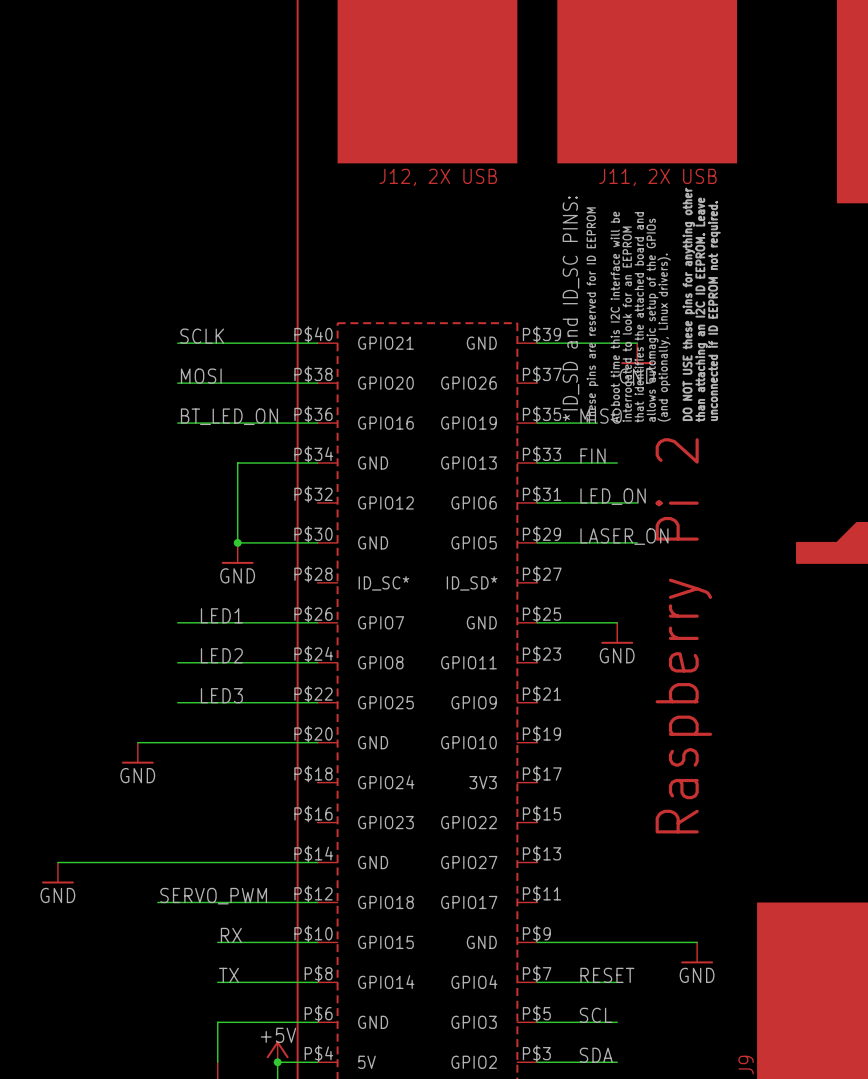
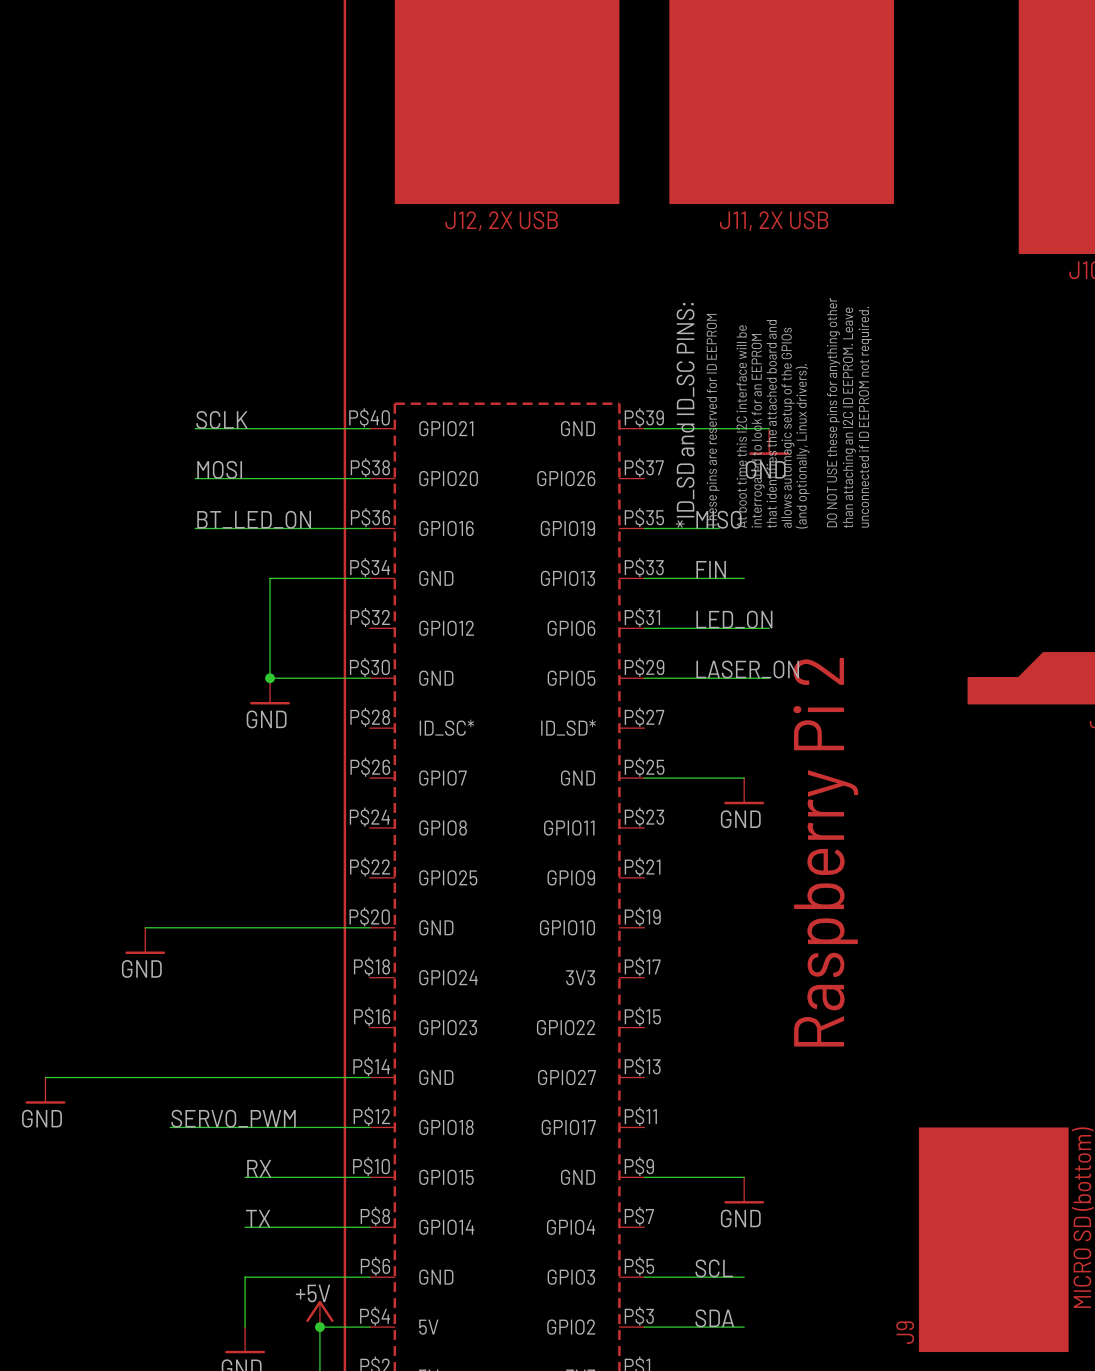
label: LED1 (221, 615) -> none
wire: (177, 622) (317, 622) -> none
label: LED2 (221, 655) -> none
wire: (177, 662) (317, 662) -> none
label: LED3 (221, 695) -> none
wire: (177, 702) (317, 702) -> none
wire: (617, 942) (697, 942) -> none
power symbol position: GND (697, 952) -> GND (744, 1190)
label: RESET (607, 975) -> none
wire: (537, 982) (617, 982) -> none

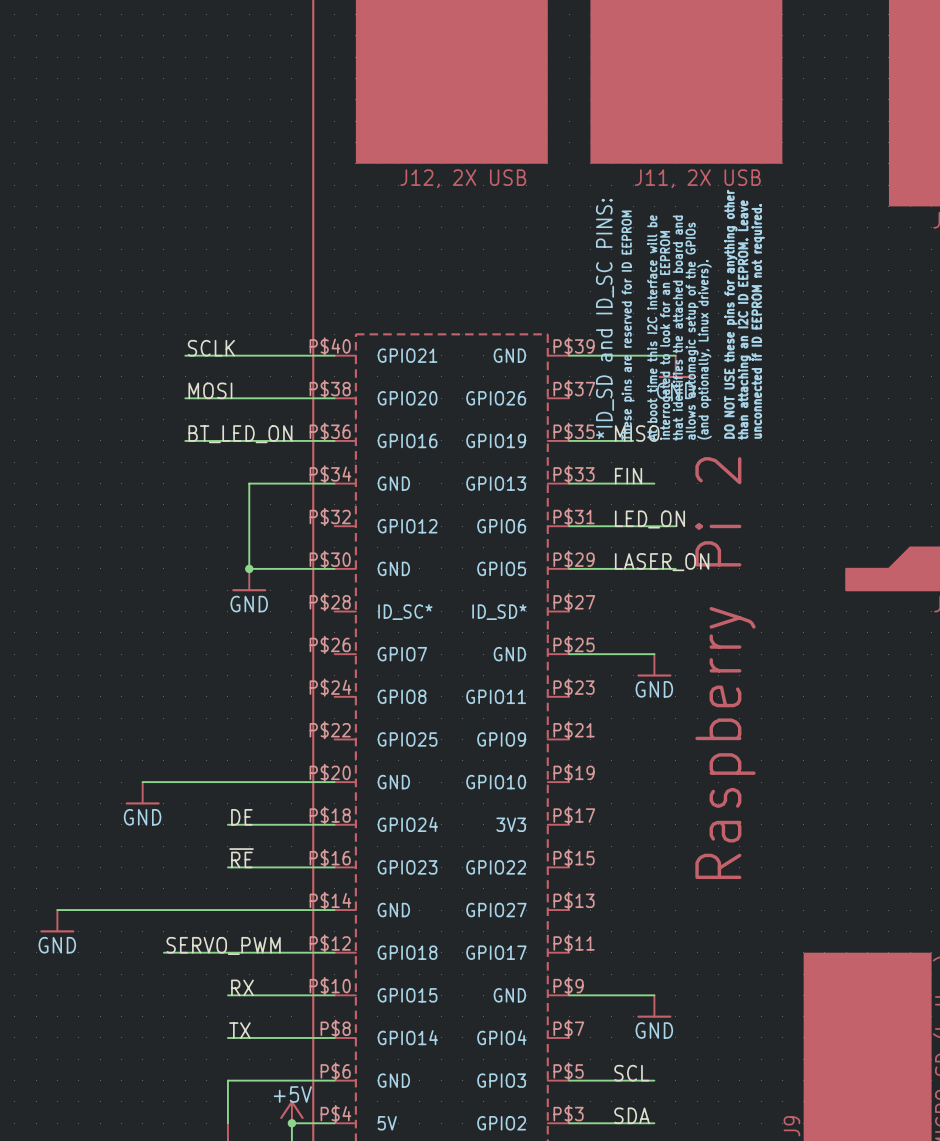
label: none -> DE (241, 817)
wire: none -> (227, 824) (334, 824)
label: none -> ~{RE} (241, 858)
wire: none -> (227, 867) (334, 867)

